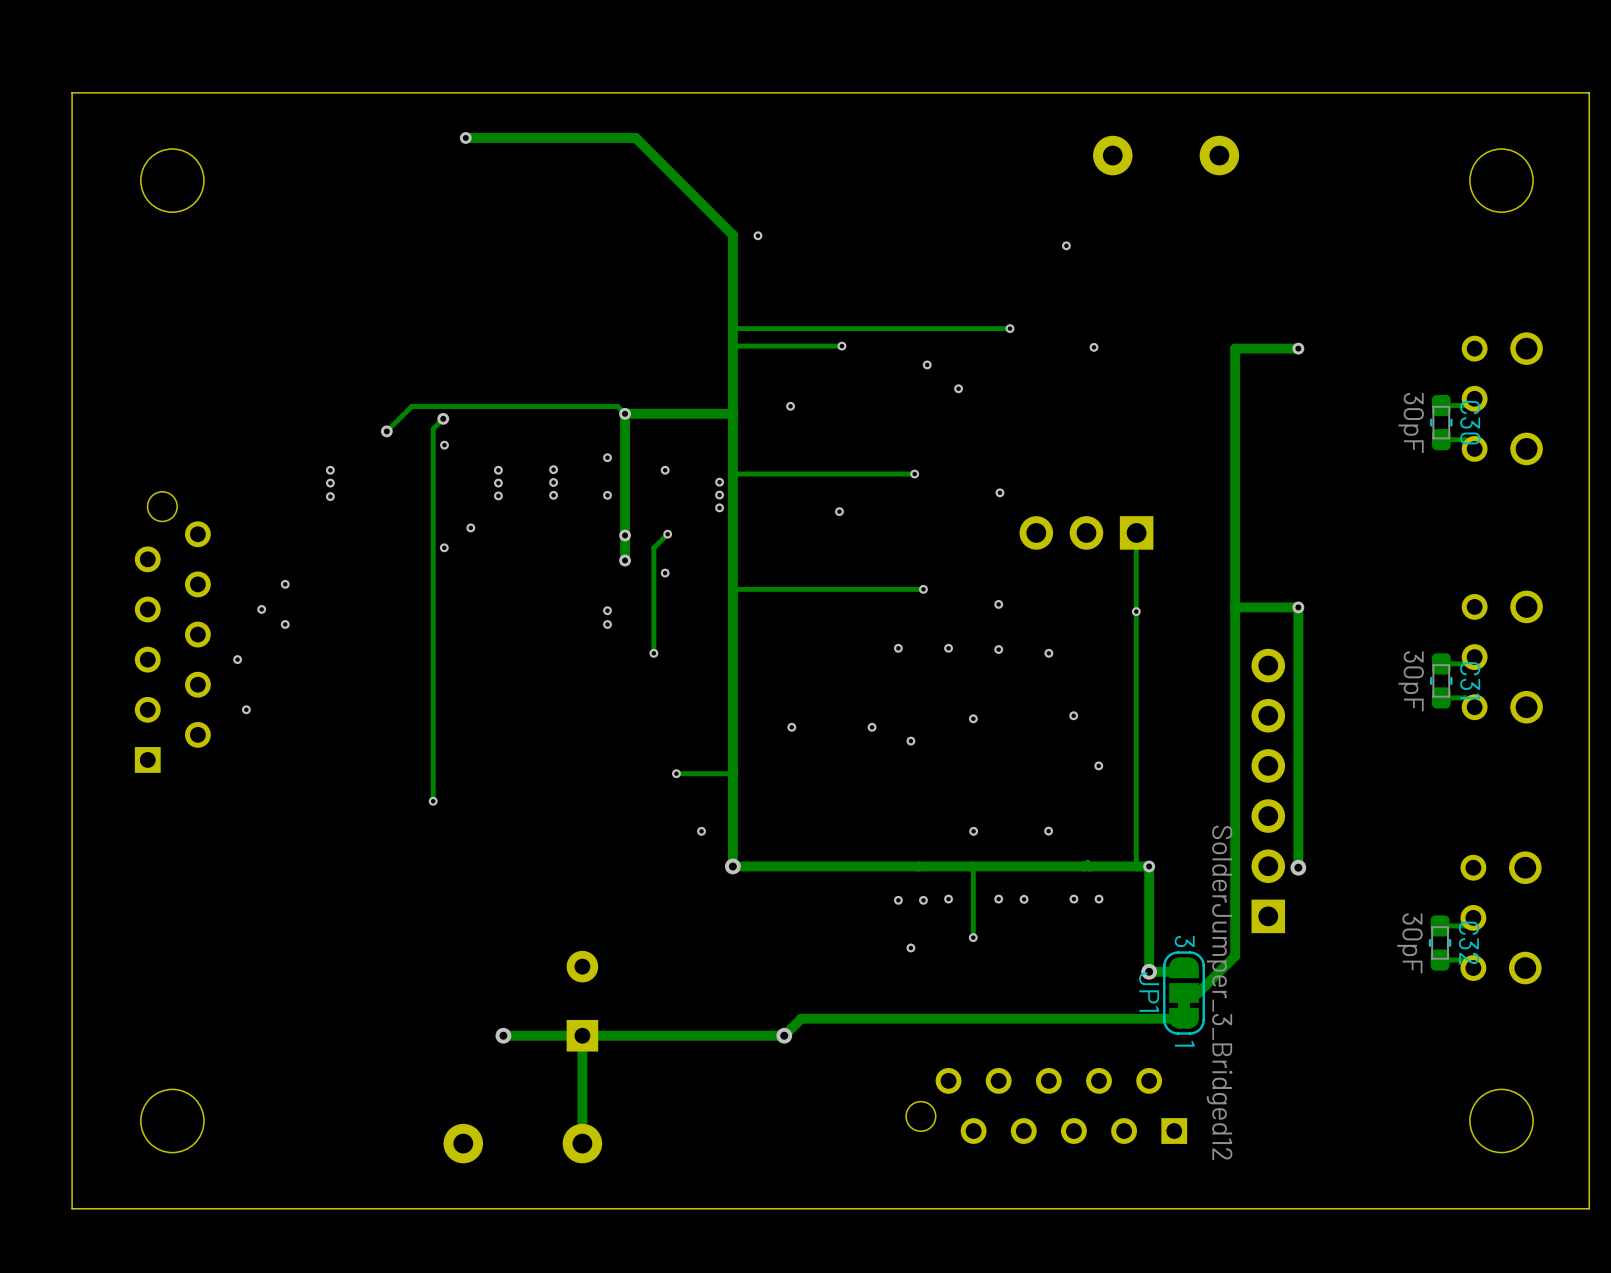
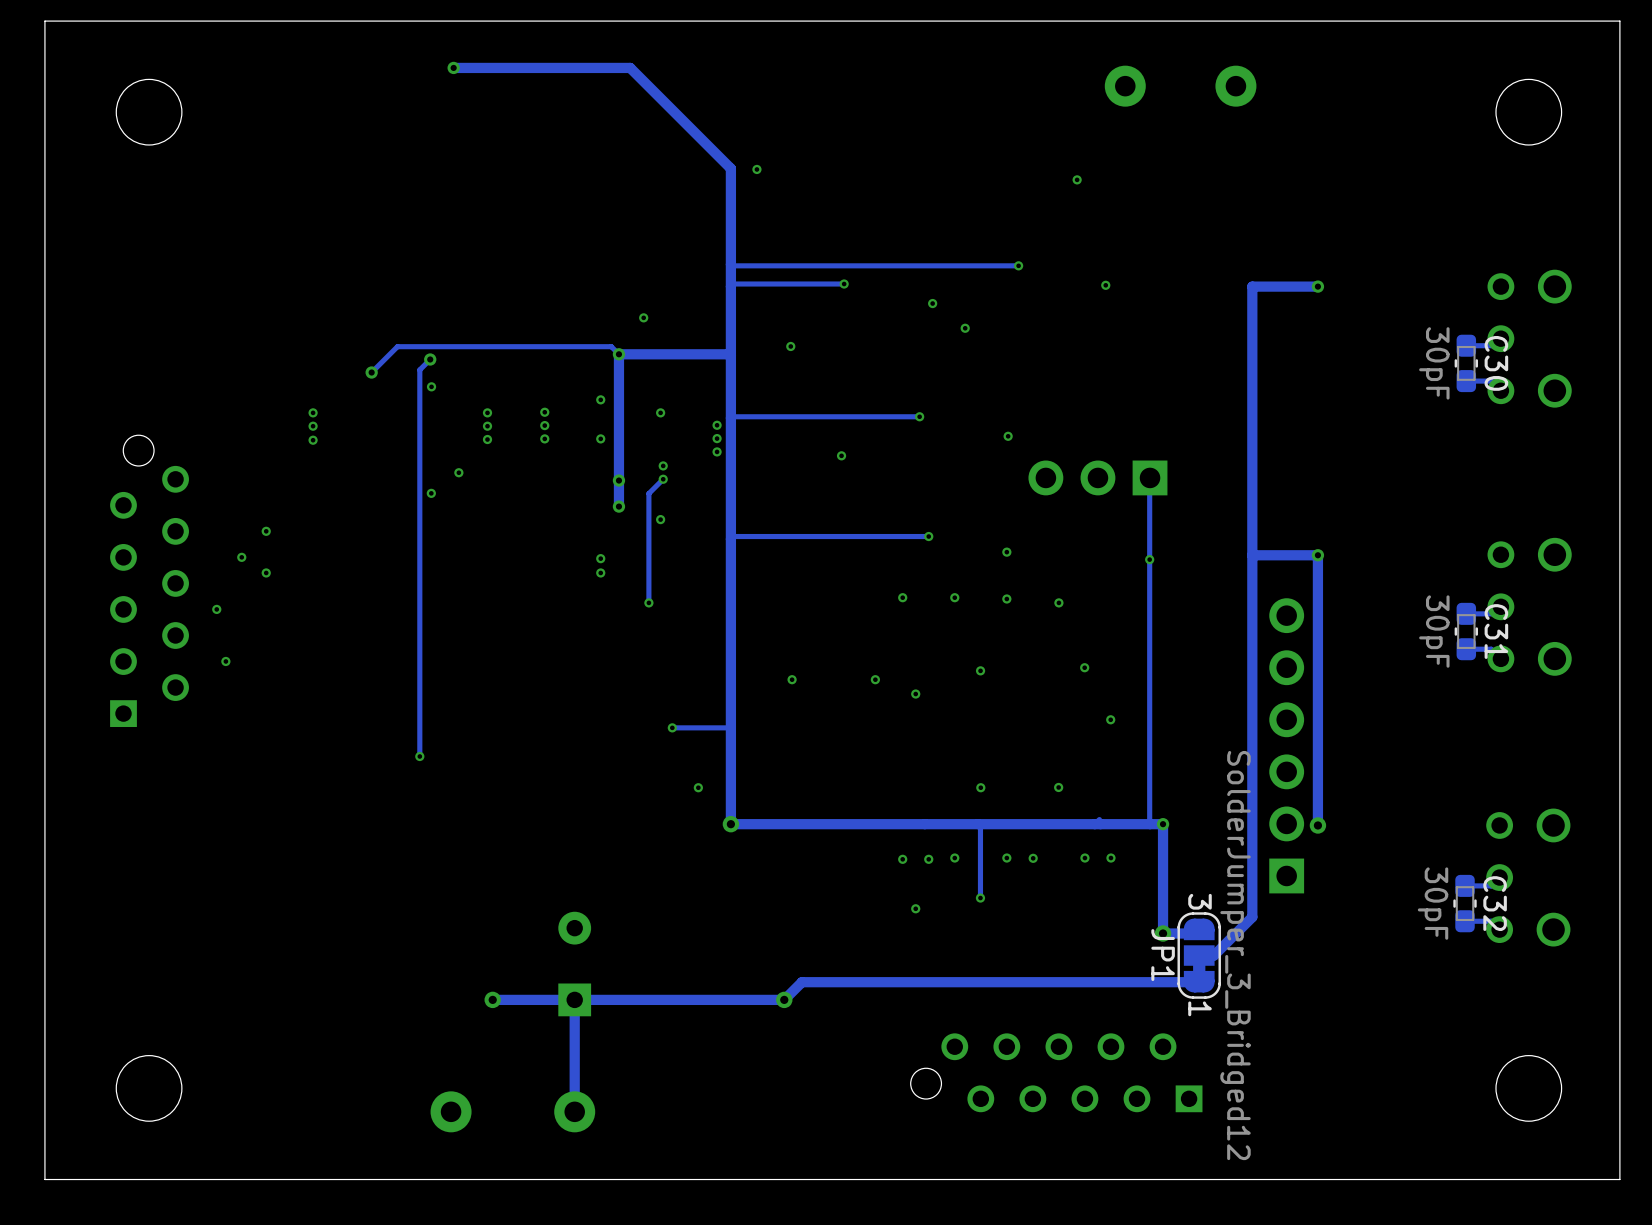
via: none -> (643, 317)
via: none -> (663, 465)

